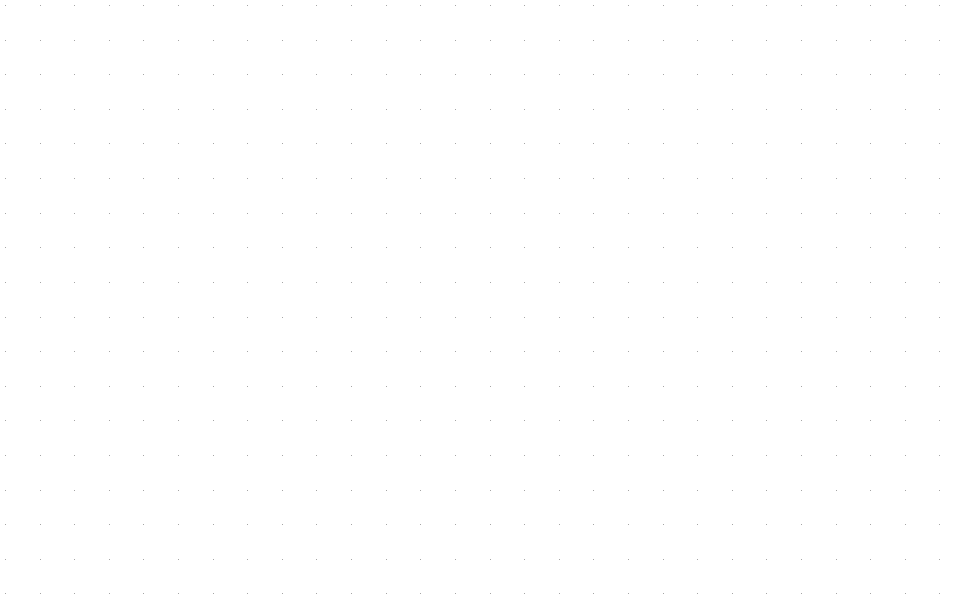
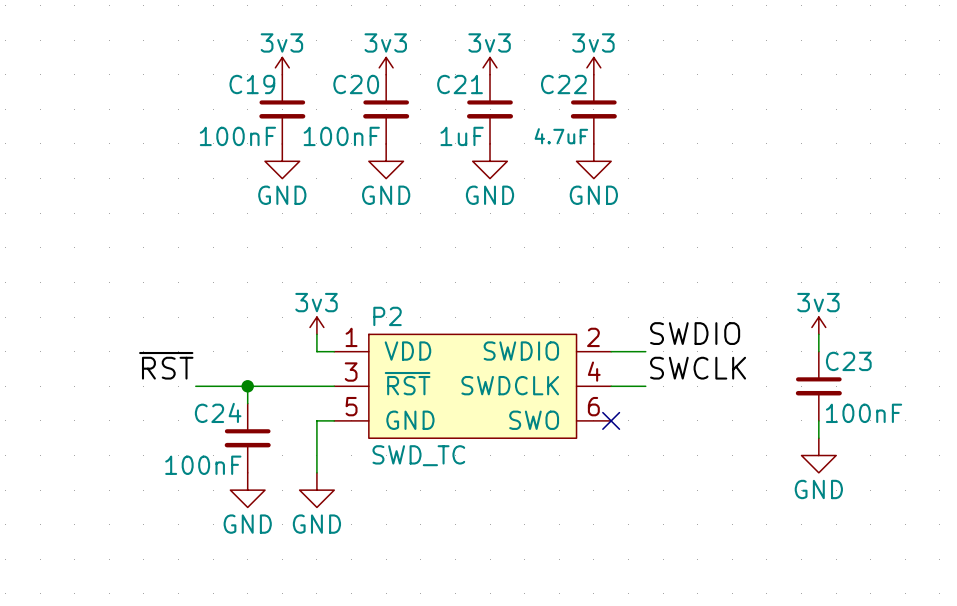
power symbol: none -> 3v3 (282, 66)
power symbol: none -> 3v3 (386, 66)
power symbol: none -> 3v3 (490, 66)
power symbol: none -> 3v3 (593, 66)
C19: none -> 100nF (282, 109)
C20: none -> 100nF (386, 109)
C21: none -> 1uF (490, 109)
C22: none -> 4.7uF (593, 109)
power symbol: none -> GND (282, 161)
power symbol: none -> GND (386, 161)
power symbol: none -> GND (490, 161)
power symbol: none -> GND (593, 161)
power symbol: none -> 3v3 (316, 325)
power symbol: none -> 3v3 (818, 325)
label: none -> SWDIO (695, 333)
wire: none -> (316, 334) (316, 351) (334, 351)
wire: none -> (818, 334) (818, 351)
wire: none -> (611, 351) (645, 351)
label: none -> ~{RST} (166, 365)
label: none -> SWCLK (698, 368)
wire: none -> (195, 386) (334, 386)
wire: none -> (247, 386) (247, 403)
junction: none -> (247, 386)
P2: none -> SWD_TC (472, 386)
wire: none -> (611, 386) (645, 386)
C23: none -> 100nF (818, 386)
wire: none -> (334, 420) (316, 420) (316, 472)
no-connect mark: none -> (611, 420)
wire: none -> (818, 420) (818, 438)
C24: none -> 100nF (247, 438)
power symbol: none -> GND (818, 455)
power symbol: none -> GND (247, 490)
power symbol: none -> GND (316, 490)

